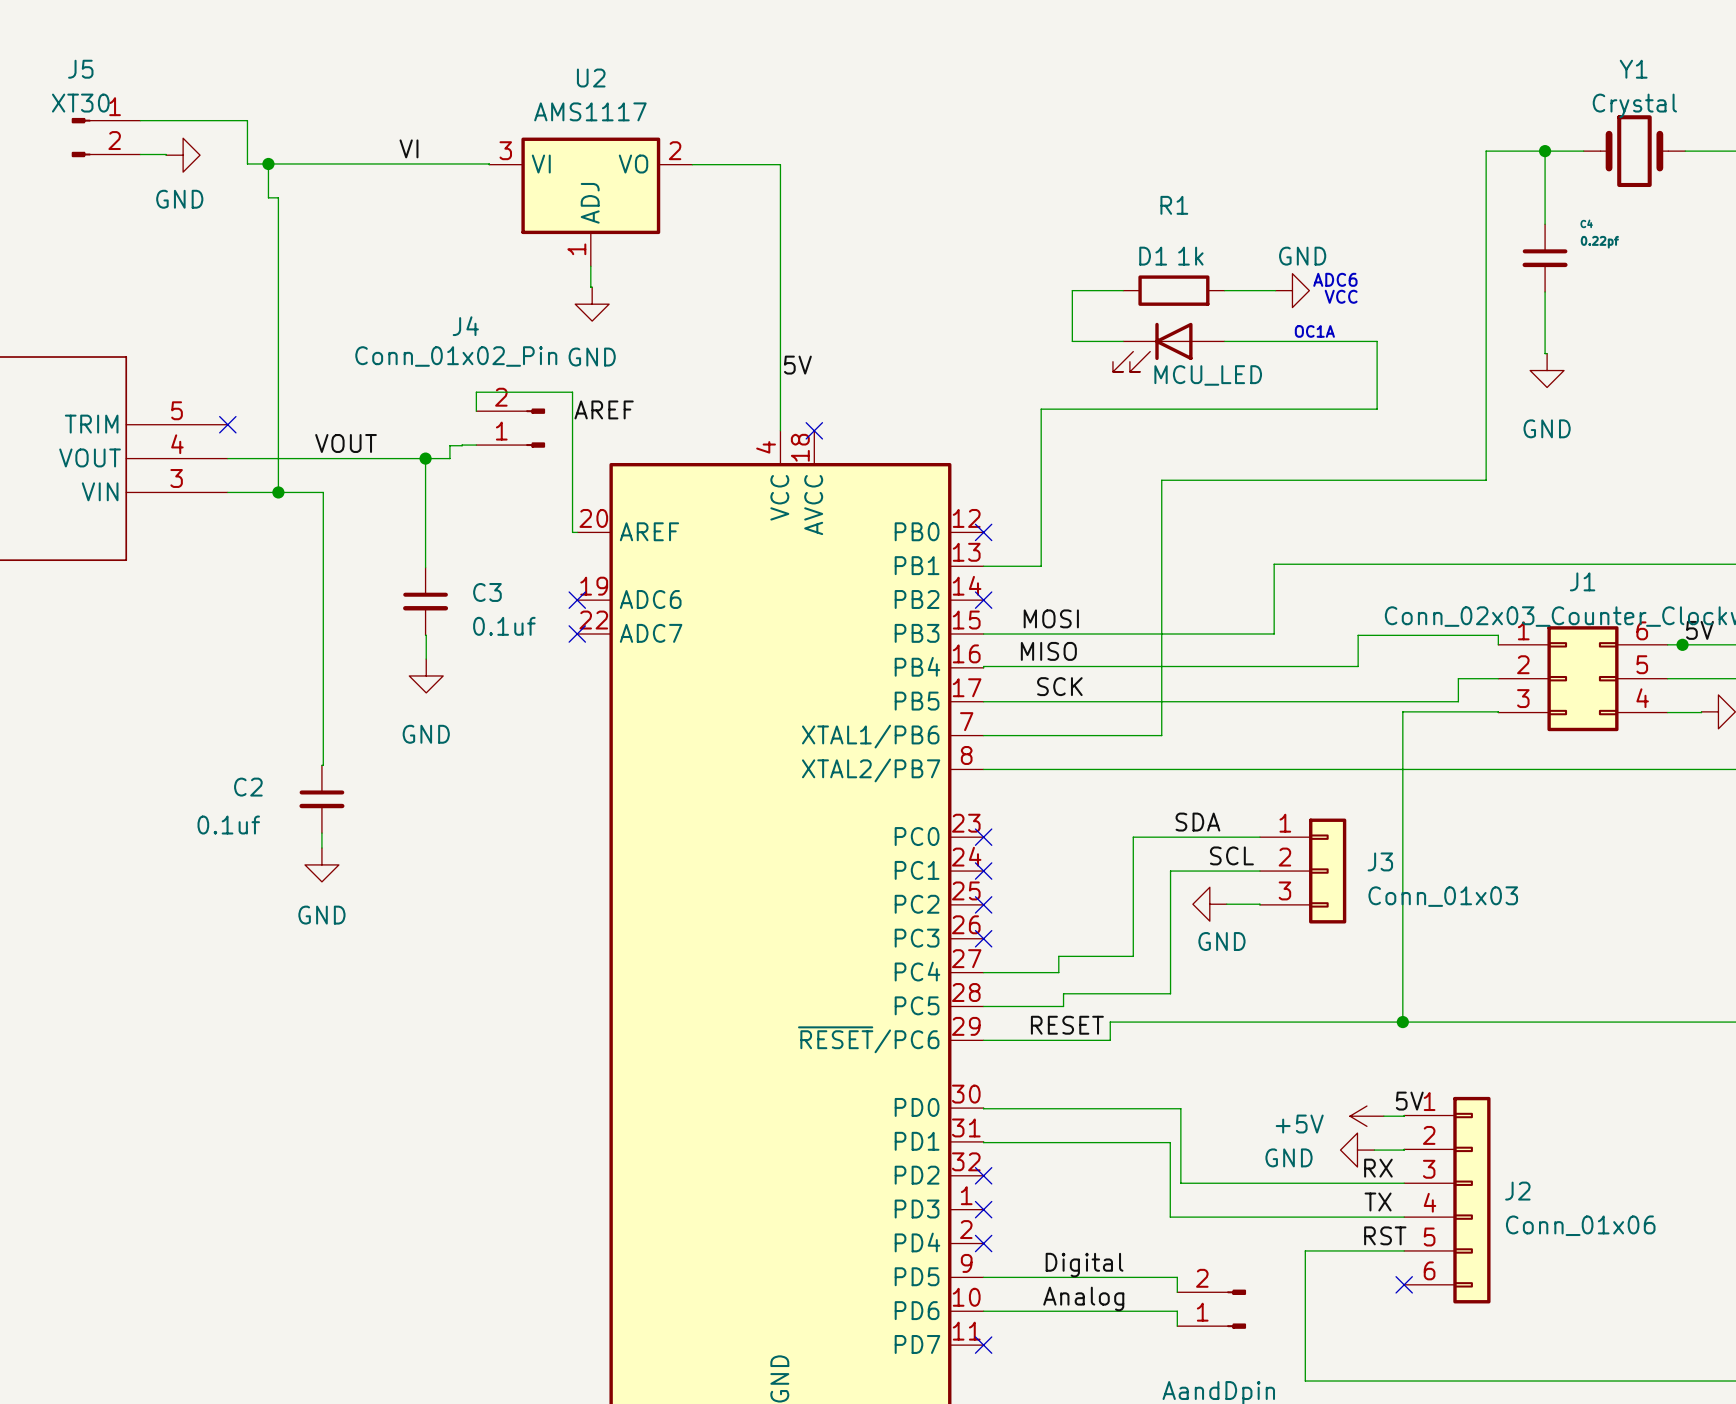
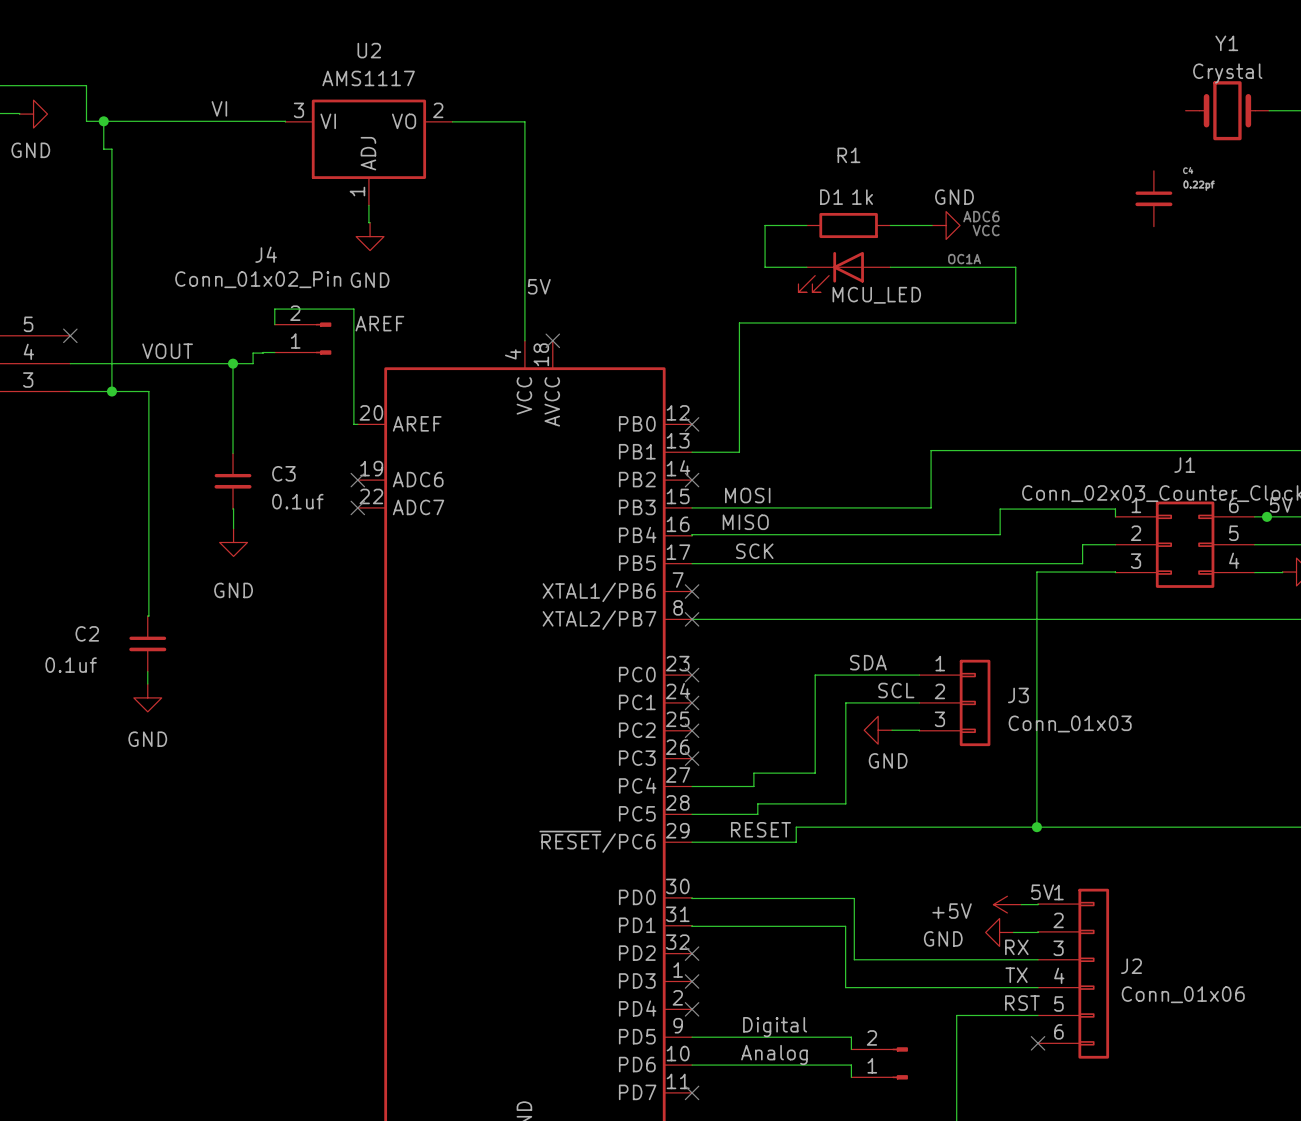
wire: (1545, 151) (1545, 224) -> none
junction: (1545, 151) -> none
wire: (1583, 151) (1486, 151) (1486, 480) (1161, 480) (1161, 735) (983, 735) -> none
wire: (1545, 291) (1545, 353) (1547, 353) -> none
power symbol: GND (1547, 370) -> none
no-connect mark: none -> (692, 591)
no-connect mark: none -> (692, 619)

